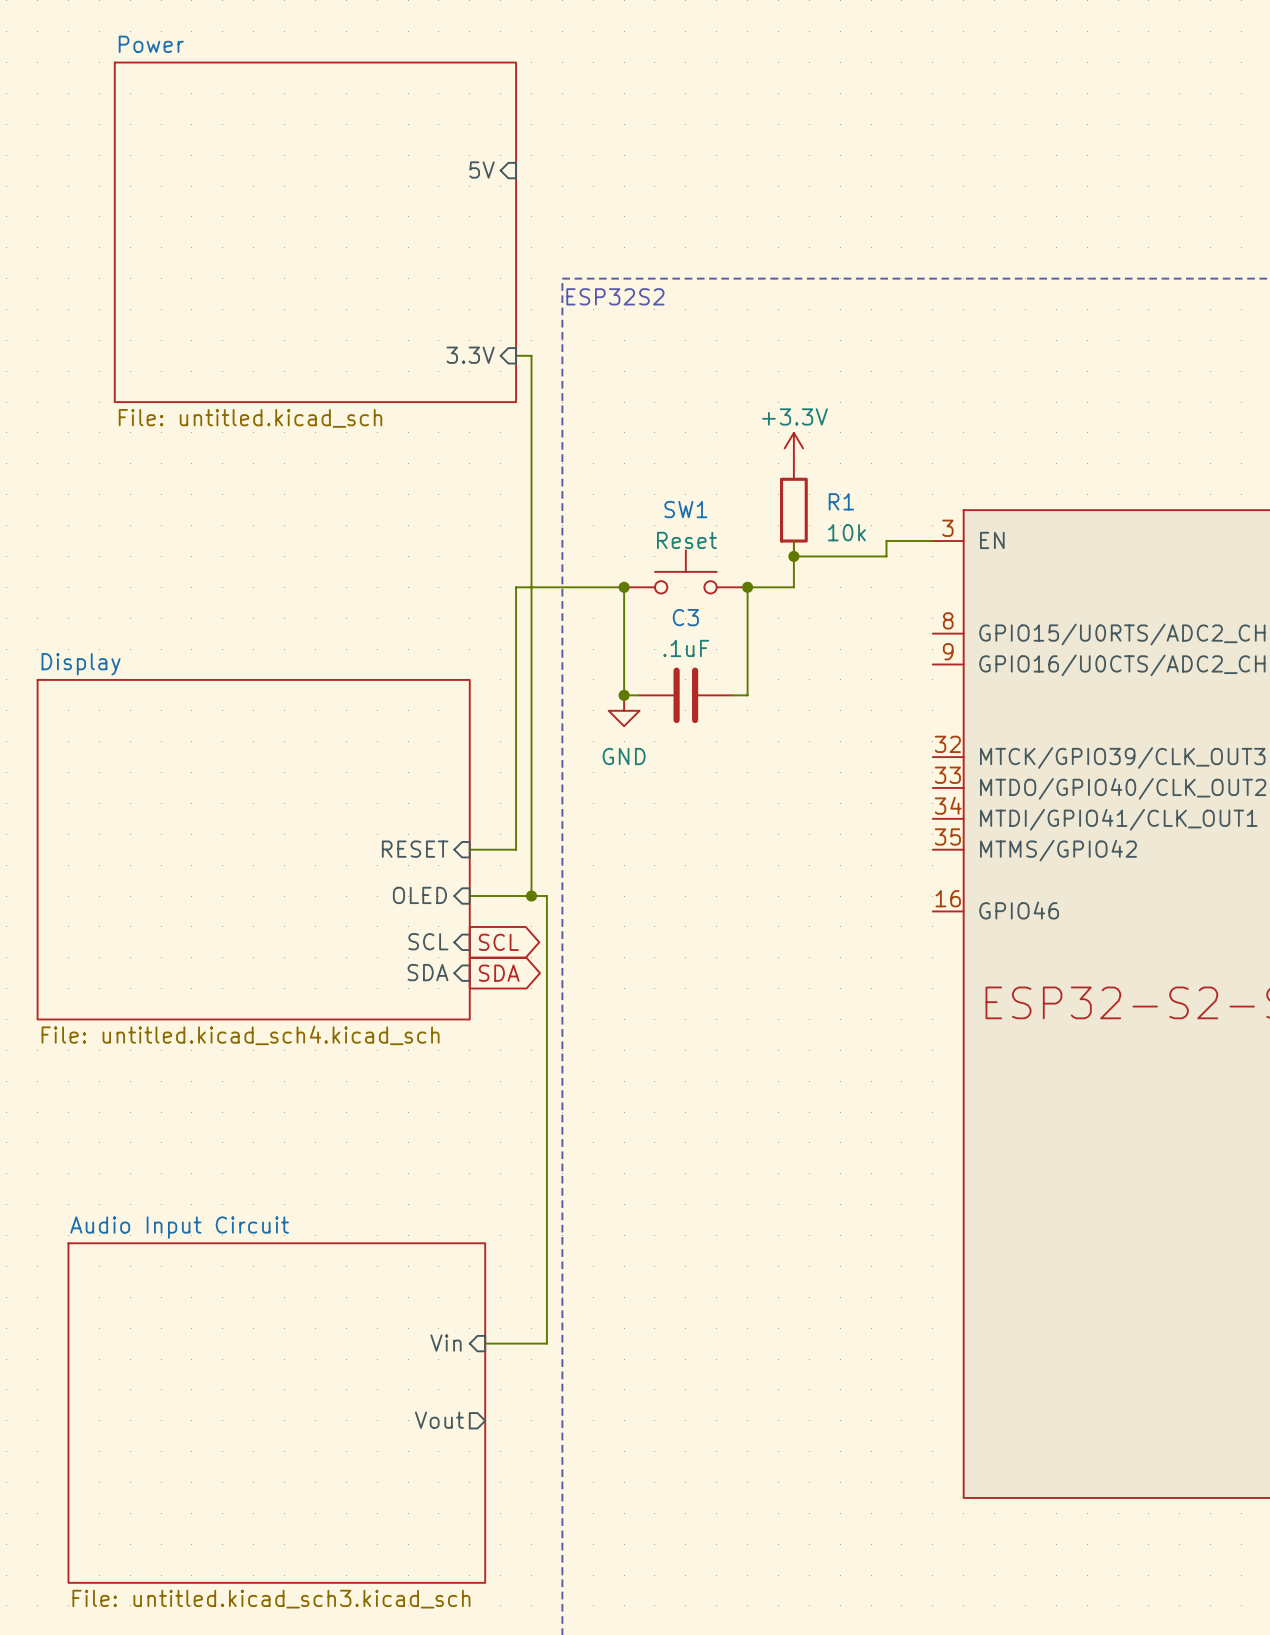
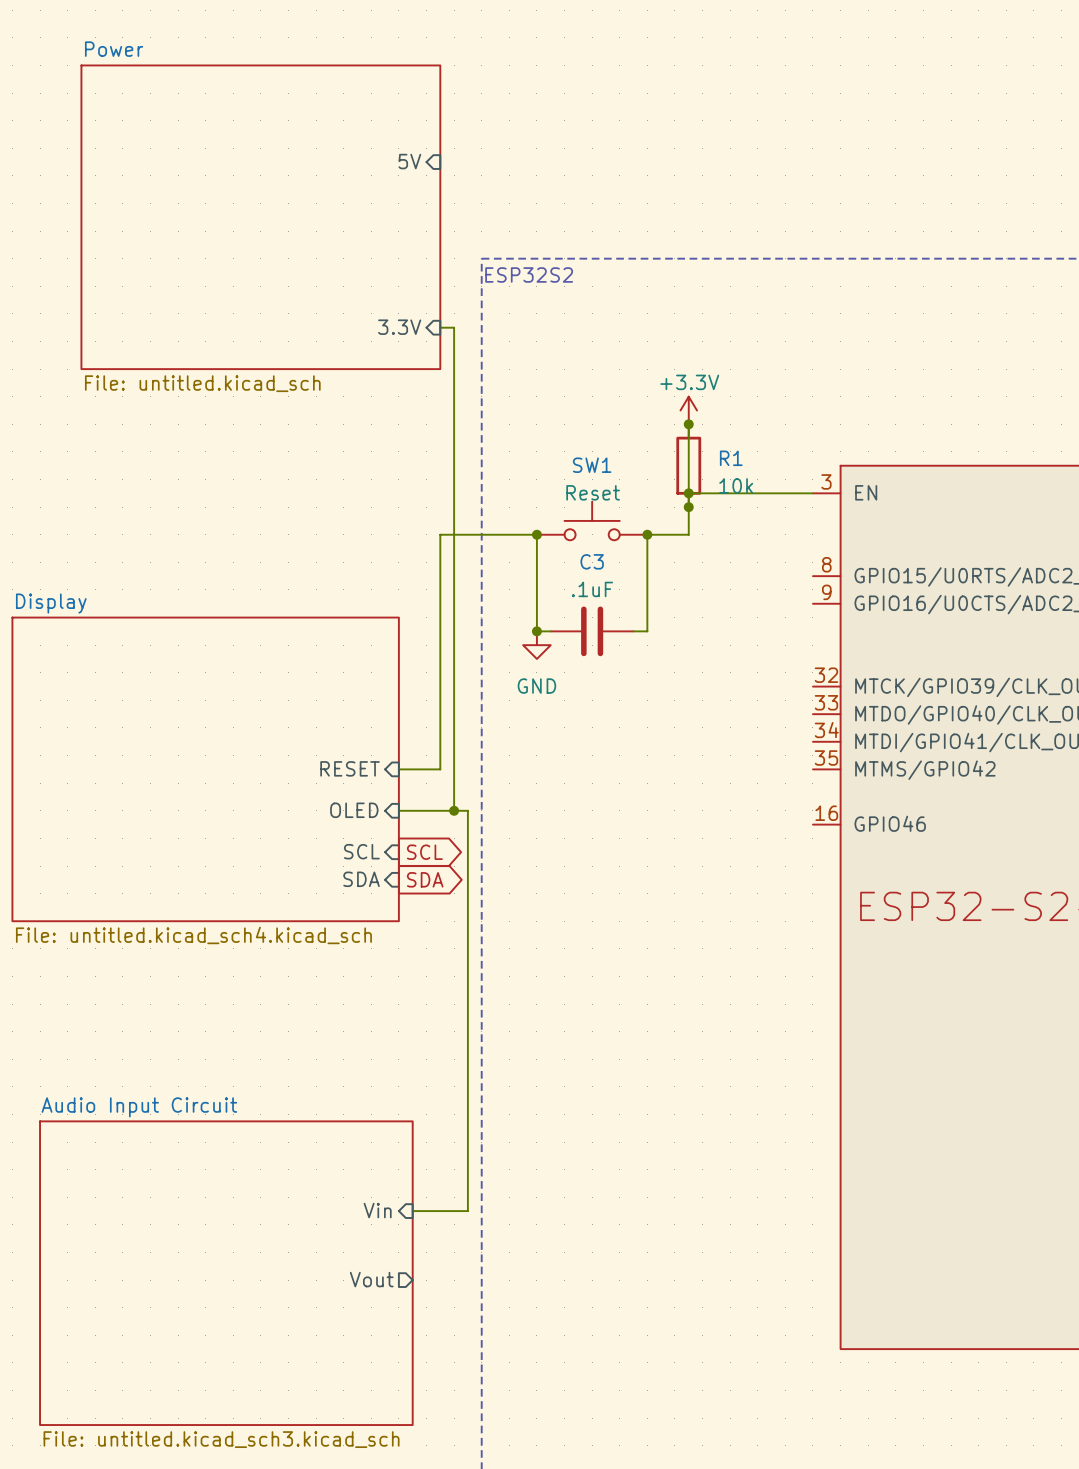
junction: none -> (688, 424)
junction: none -> (688, 493)
wire: (886, 541) (886, 556) (793, 556) -> (771, 493) (688, 493) (688, 424)

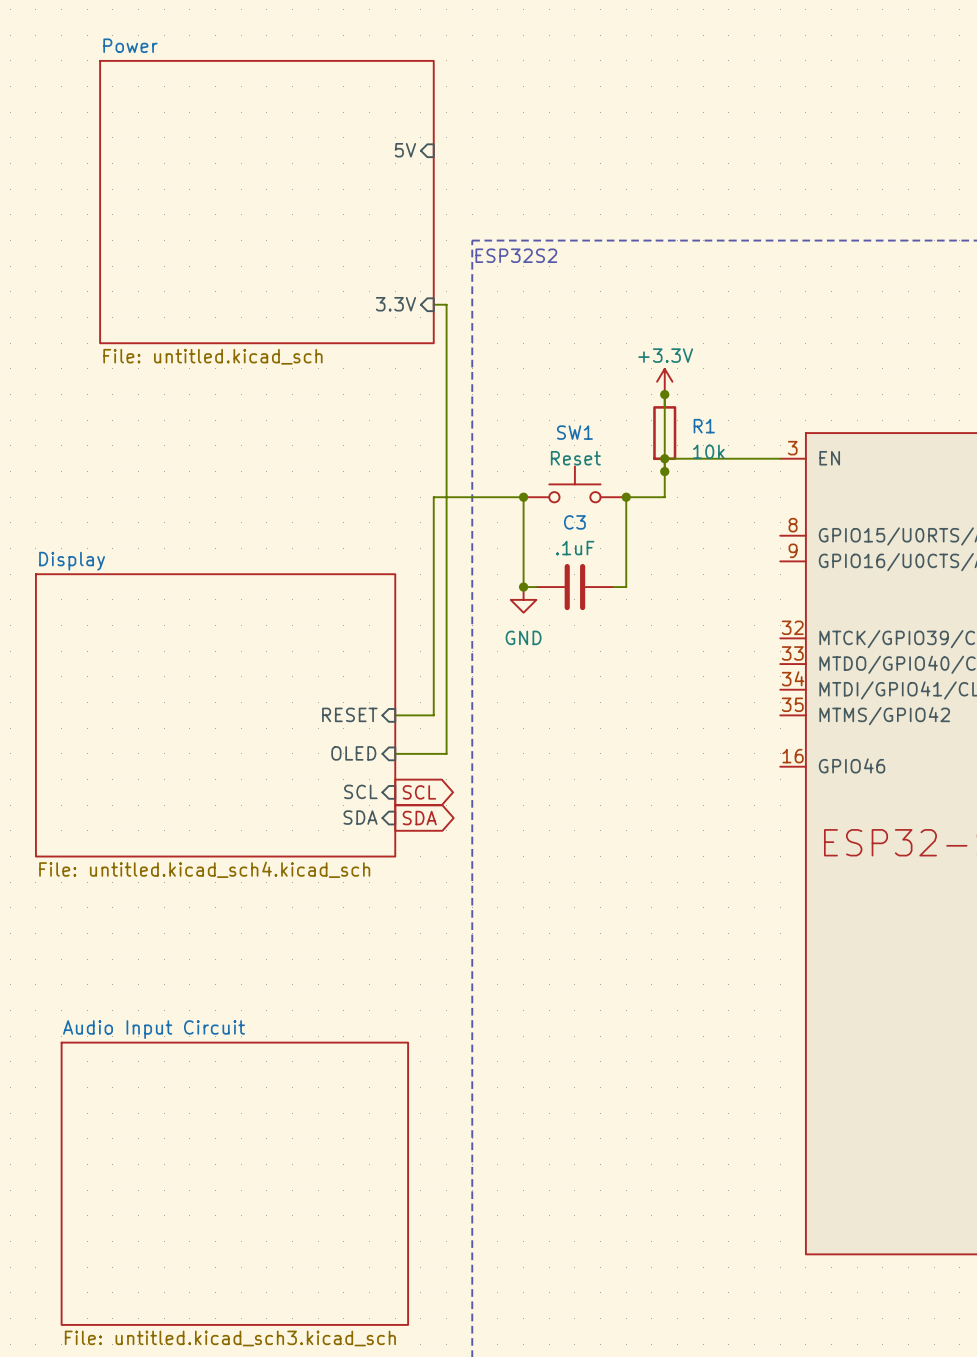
wire: (454, 810) (467, 810) (467, 1211) (412, 1211) -> none
junction: (454, 810) -> none
sheet pin: Vin (377, 1210) -> none
sheet pin: Vout (371, 1279) -> none

